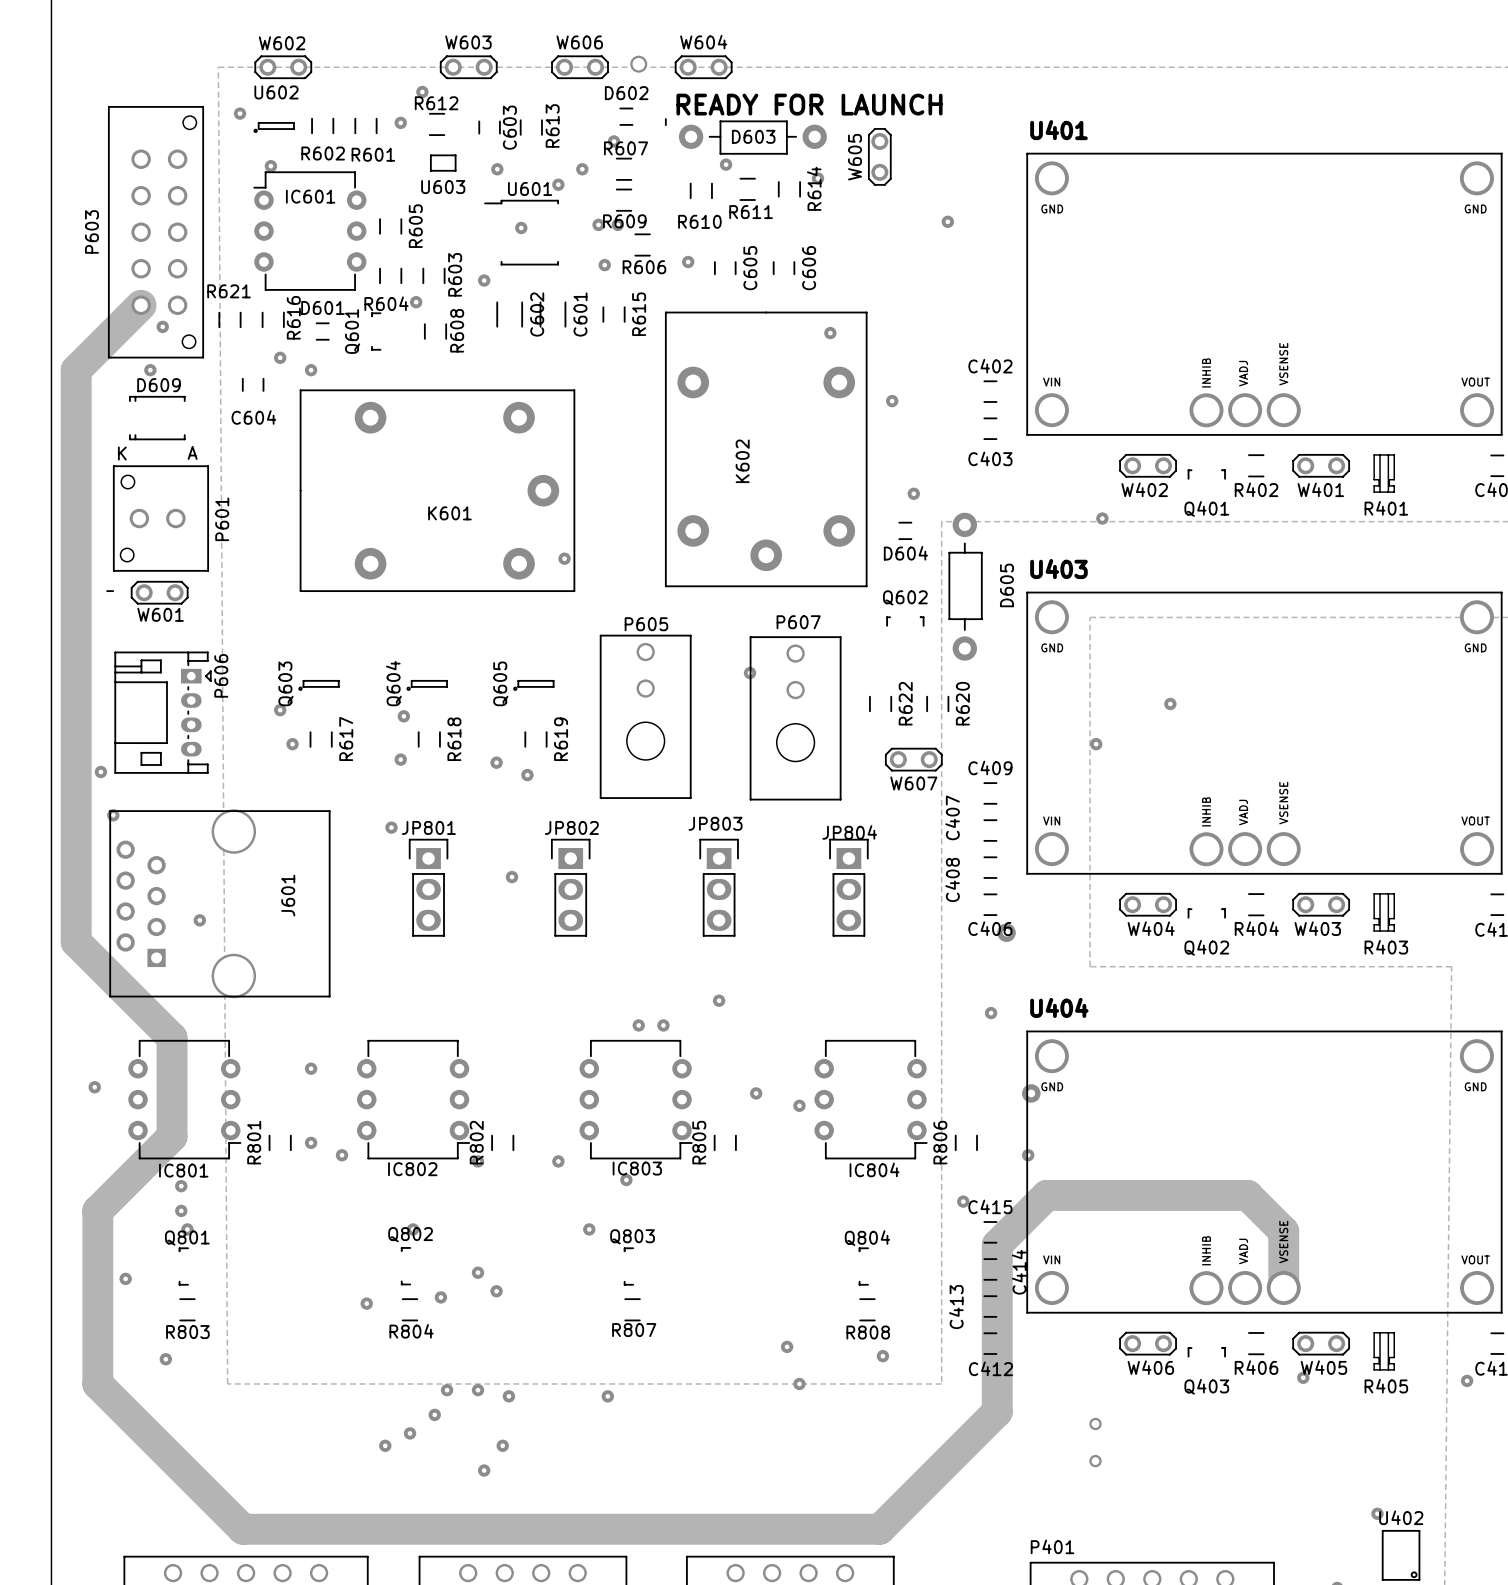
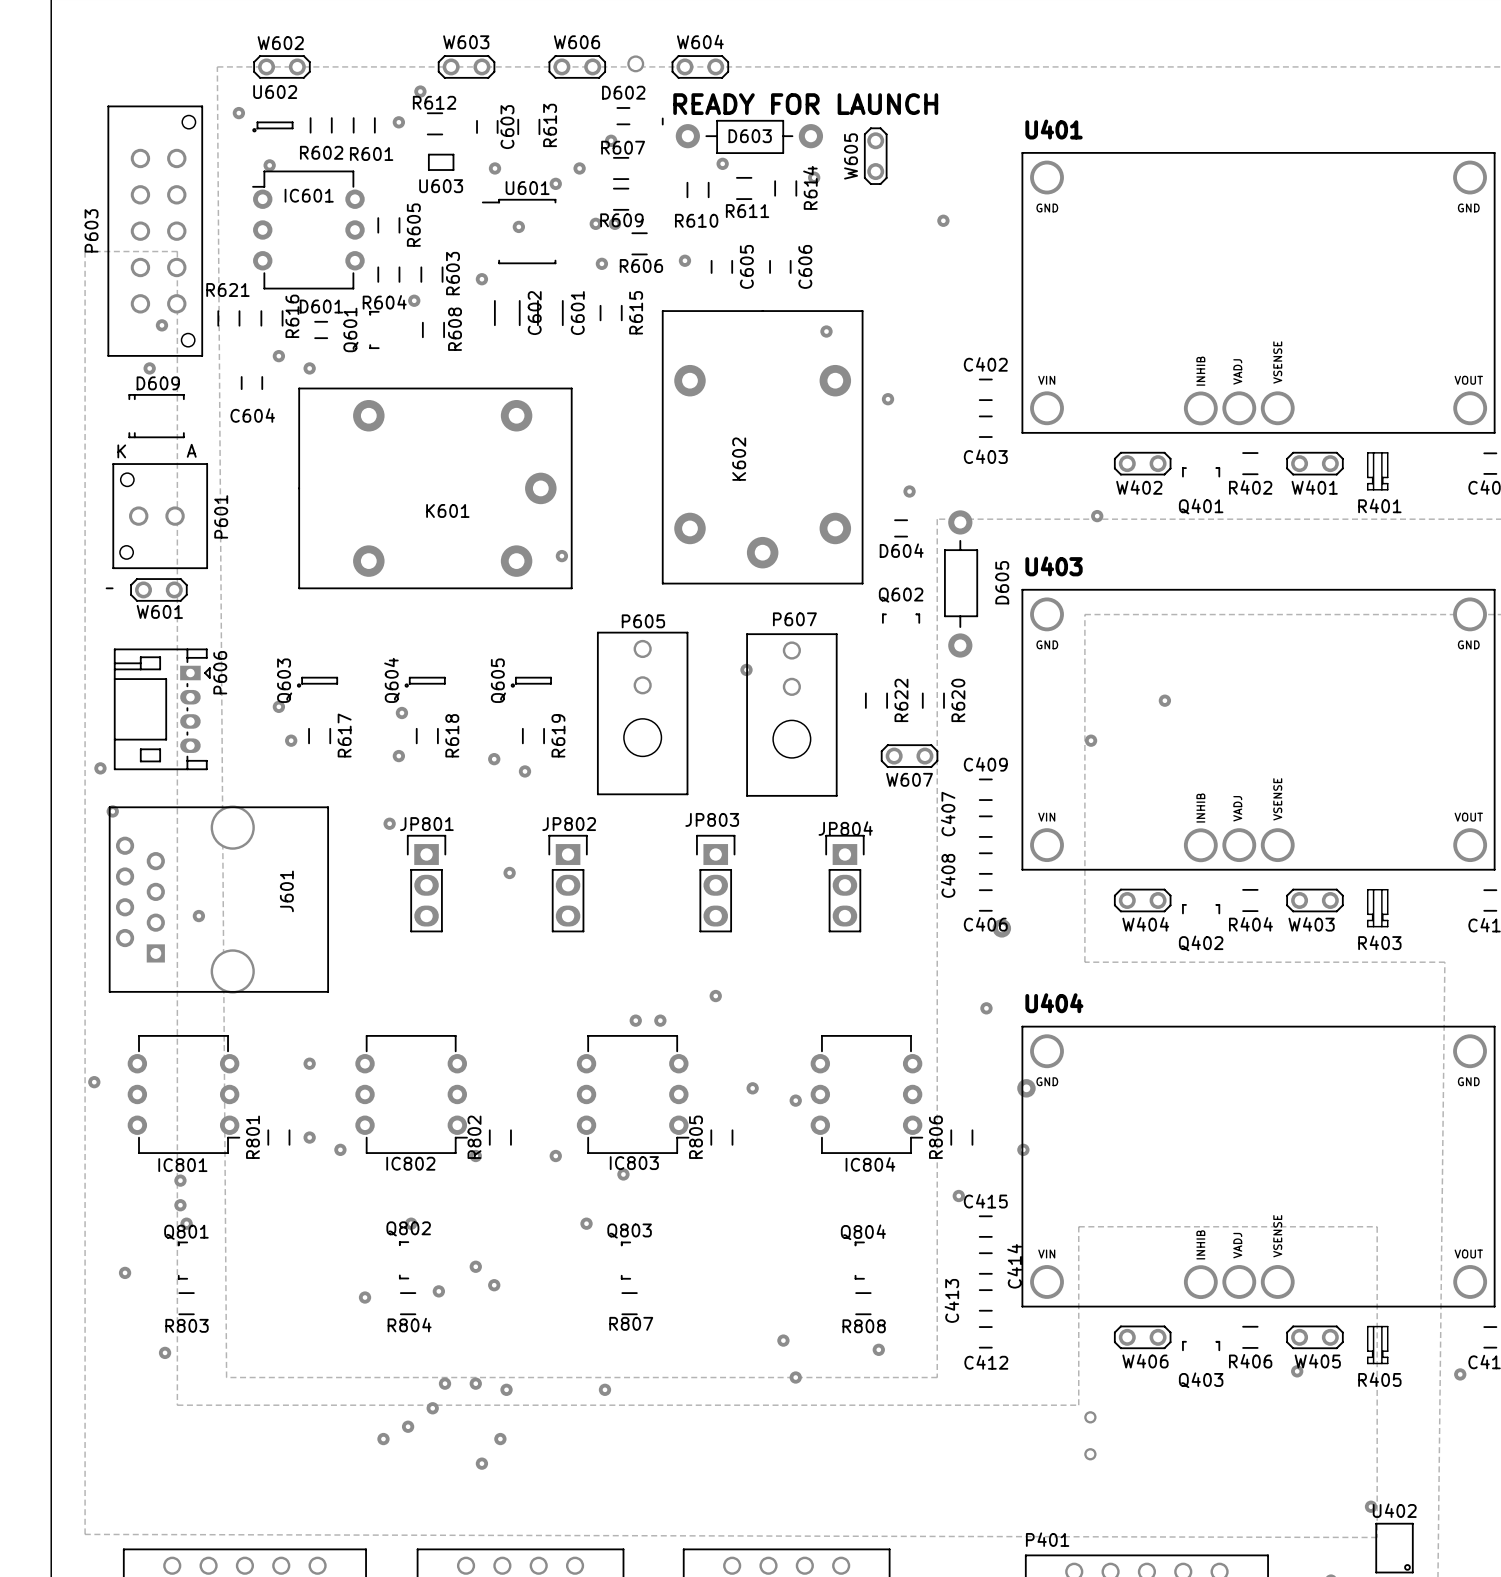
zone outline: none -> (85, 251) (85, 1534) (1377, 1537) (1377, 1226) (1078, 1226) (1078, 1405) (177, 1405) (177, 251) (85, 251)
track: (141, 305) (76, 370) (76, 941) (172, 1037) (172, 1136) (97, 1210) (97, 1383) (243, 1529) (879, 1529) (997, 1411) (997, 1244) (1046, 1195) (1247, 1195) (1283, 1231) (1283, 1287) -> none

